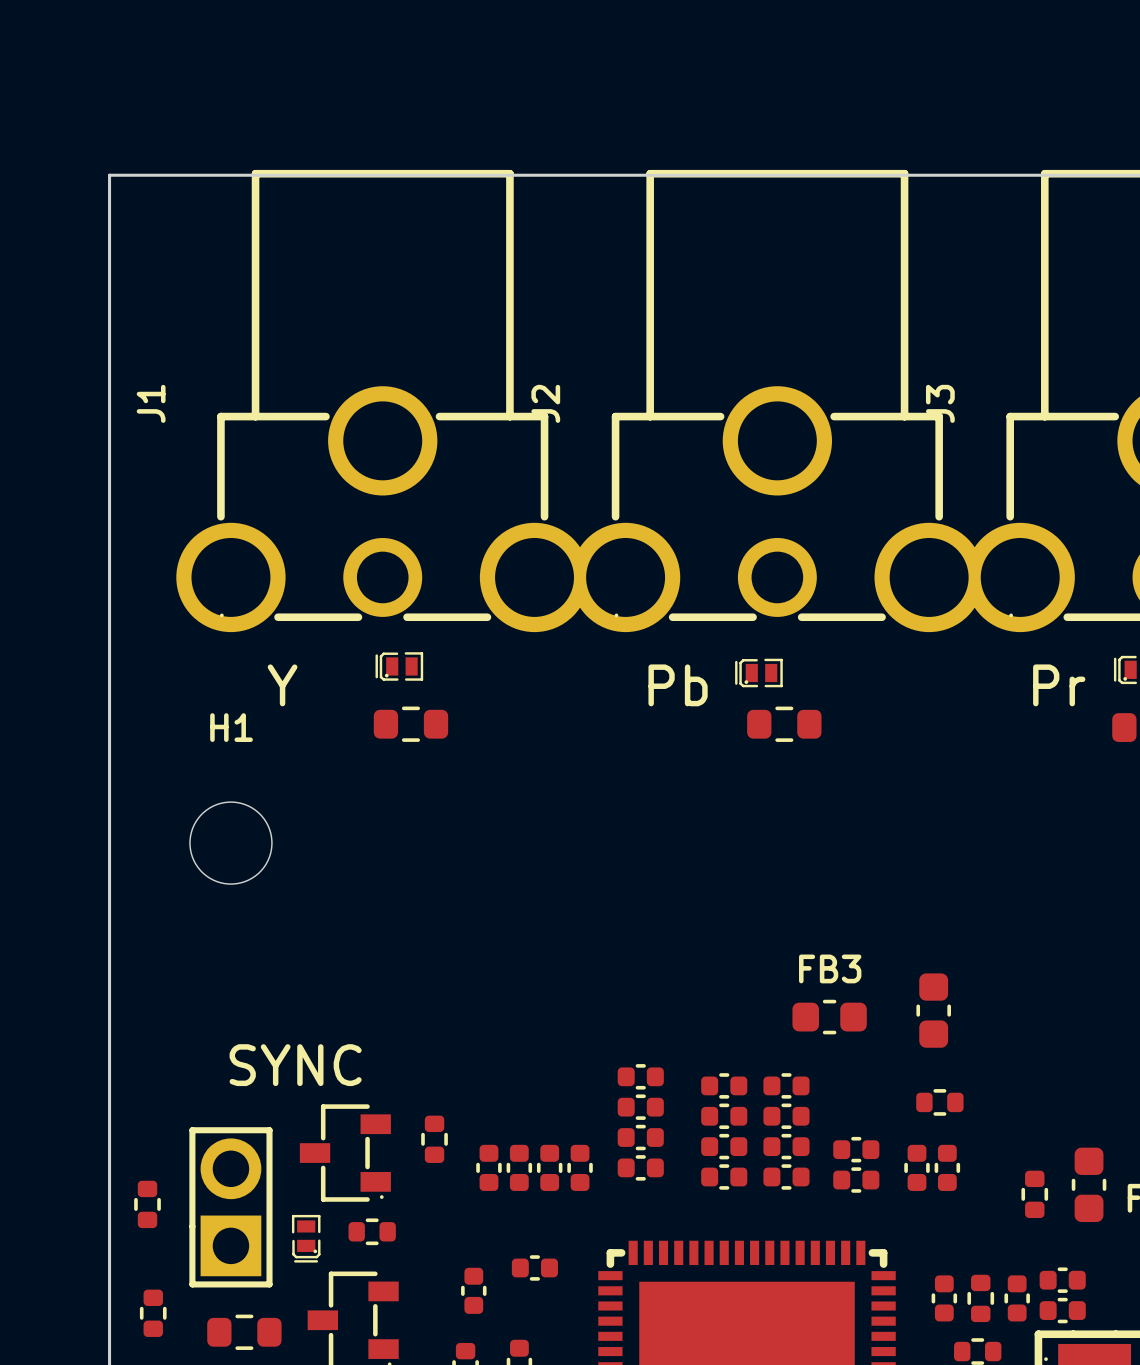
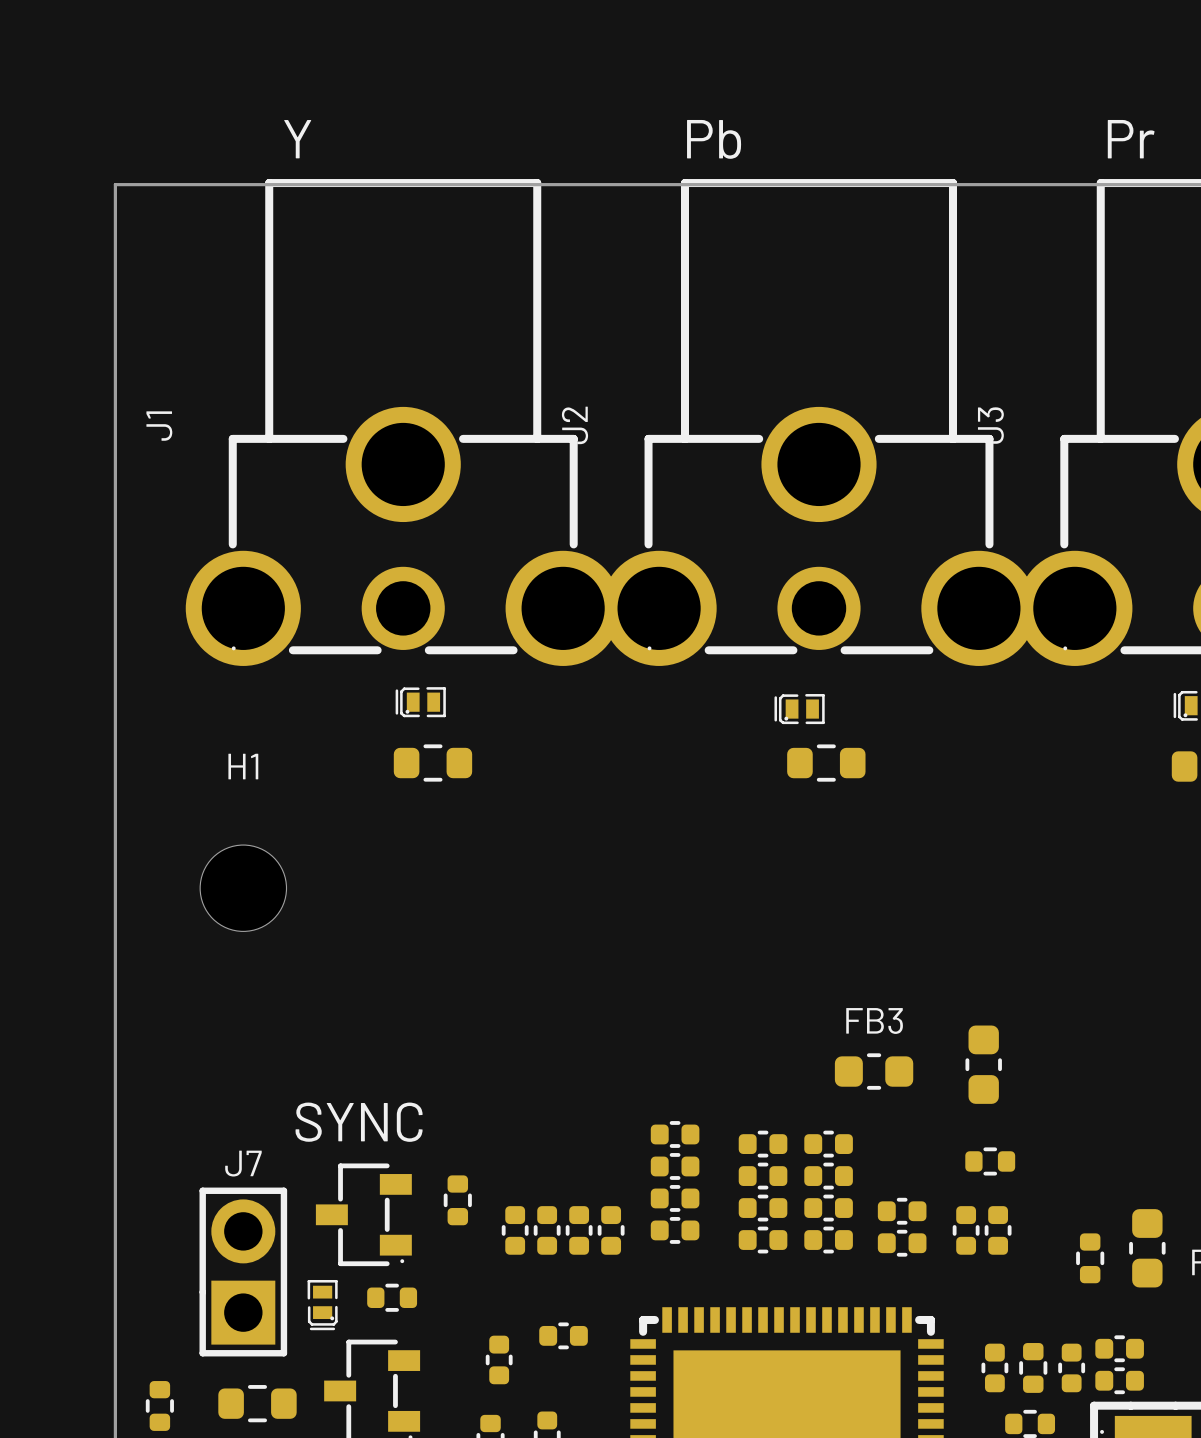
text position: Y (282, 685) -> Y (297, 139)
text position: Pb (678, 685) -> Pb (714, 139)
text position: Pr (1059, 685) -> Pr (1131, 139)
text position: SYNC (295, 1065) -> SYNC (359, 1122)
J7 name: none -> J7 (243, 1163)
part: (147, 1204) -> none
part position: (153, 1313) -> (159, 1405)

